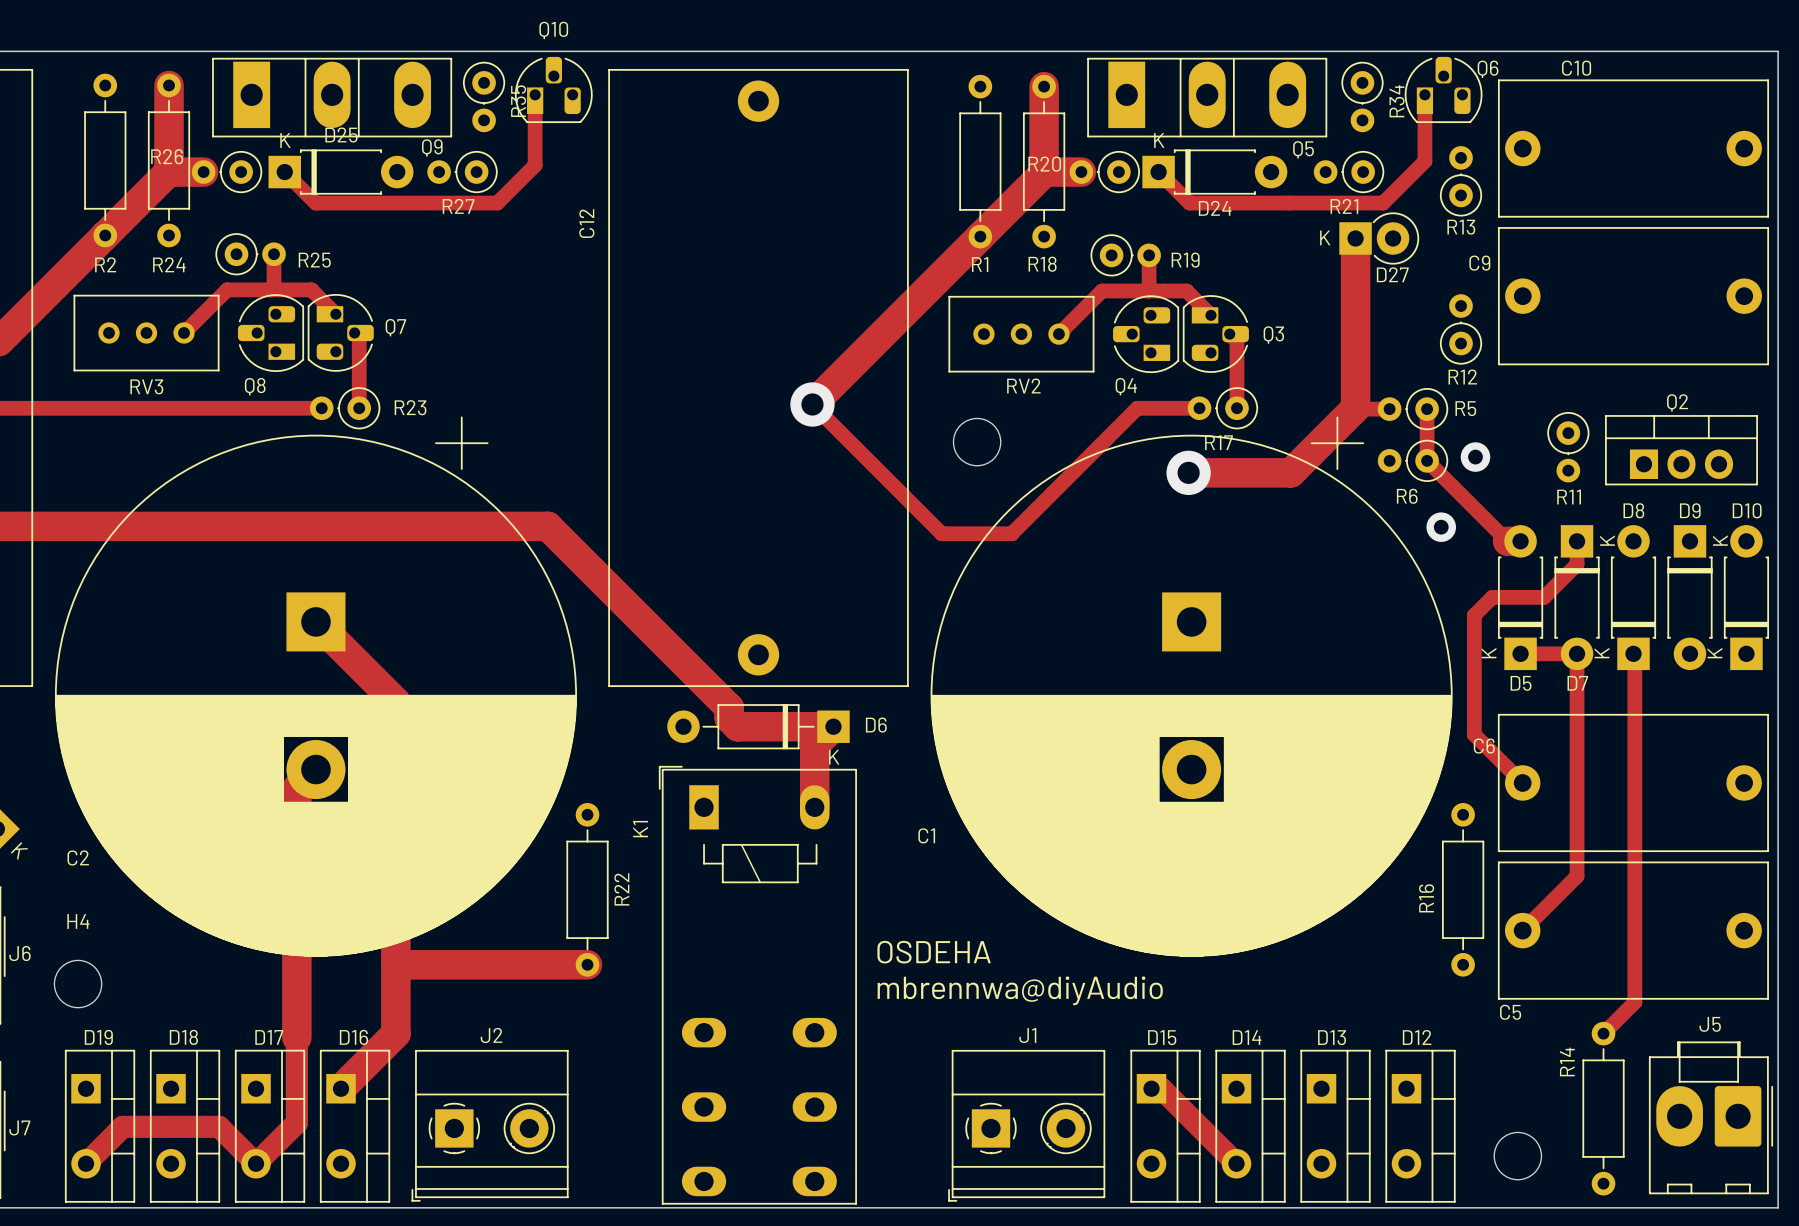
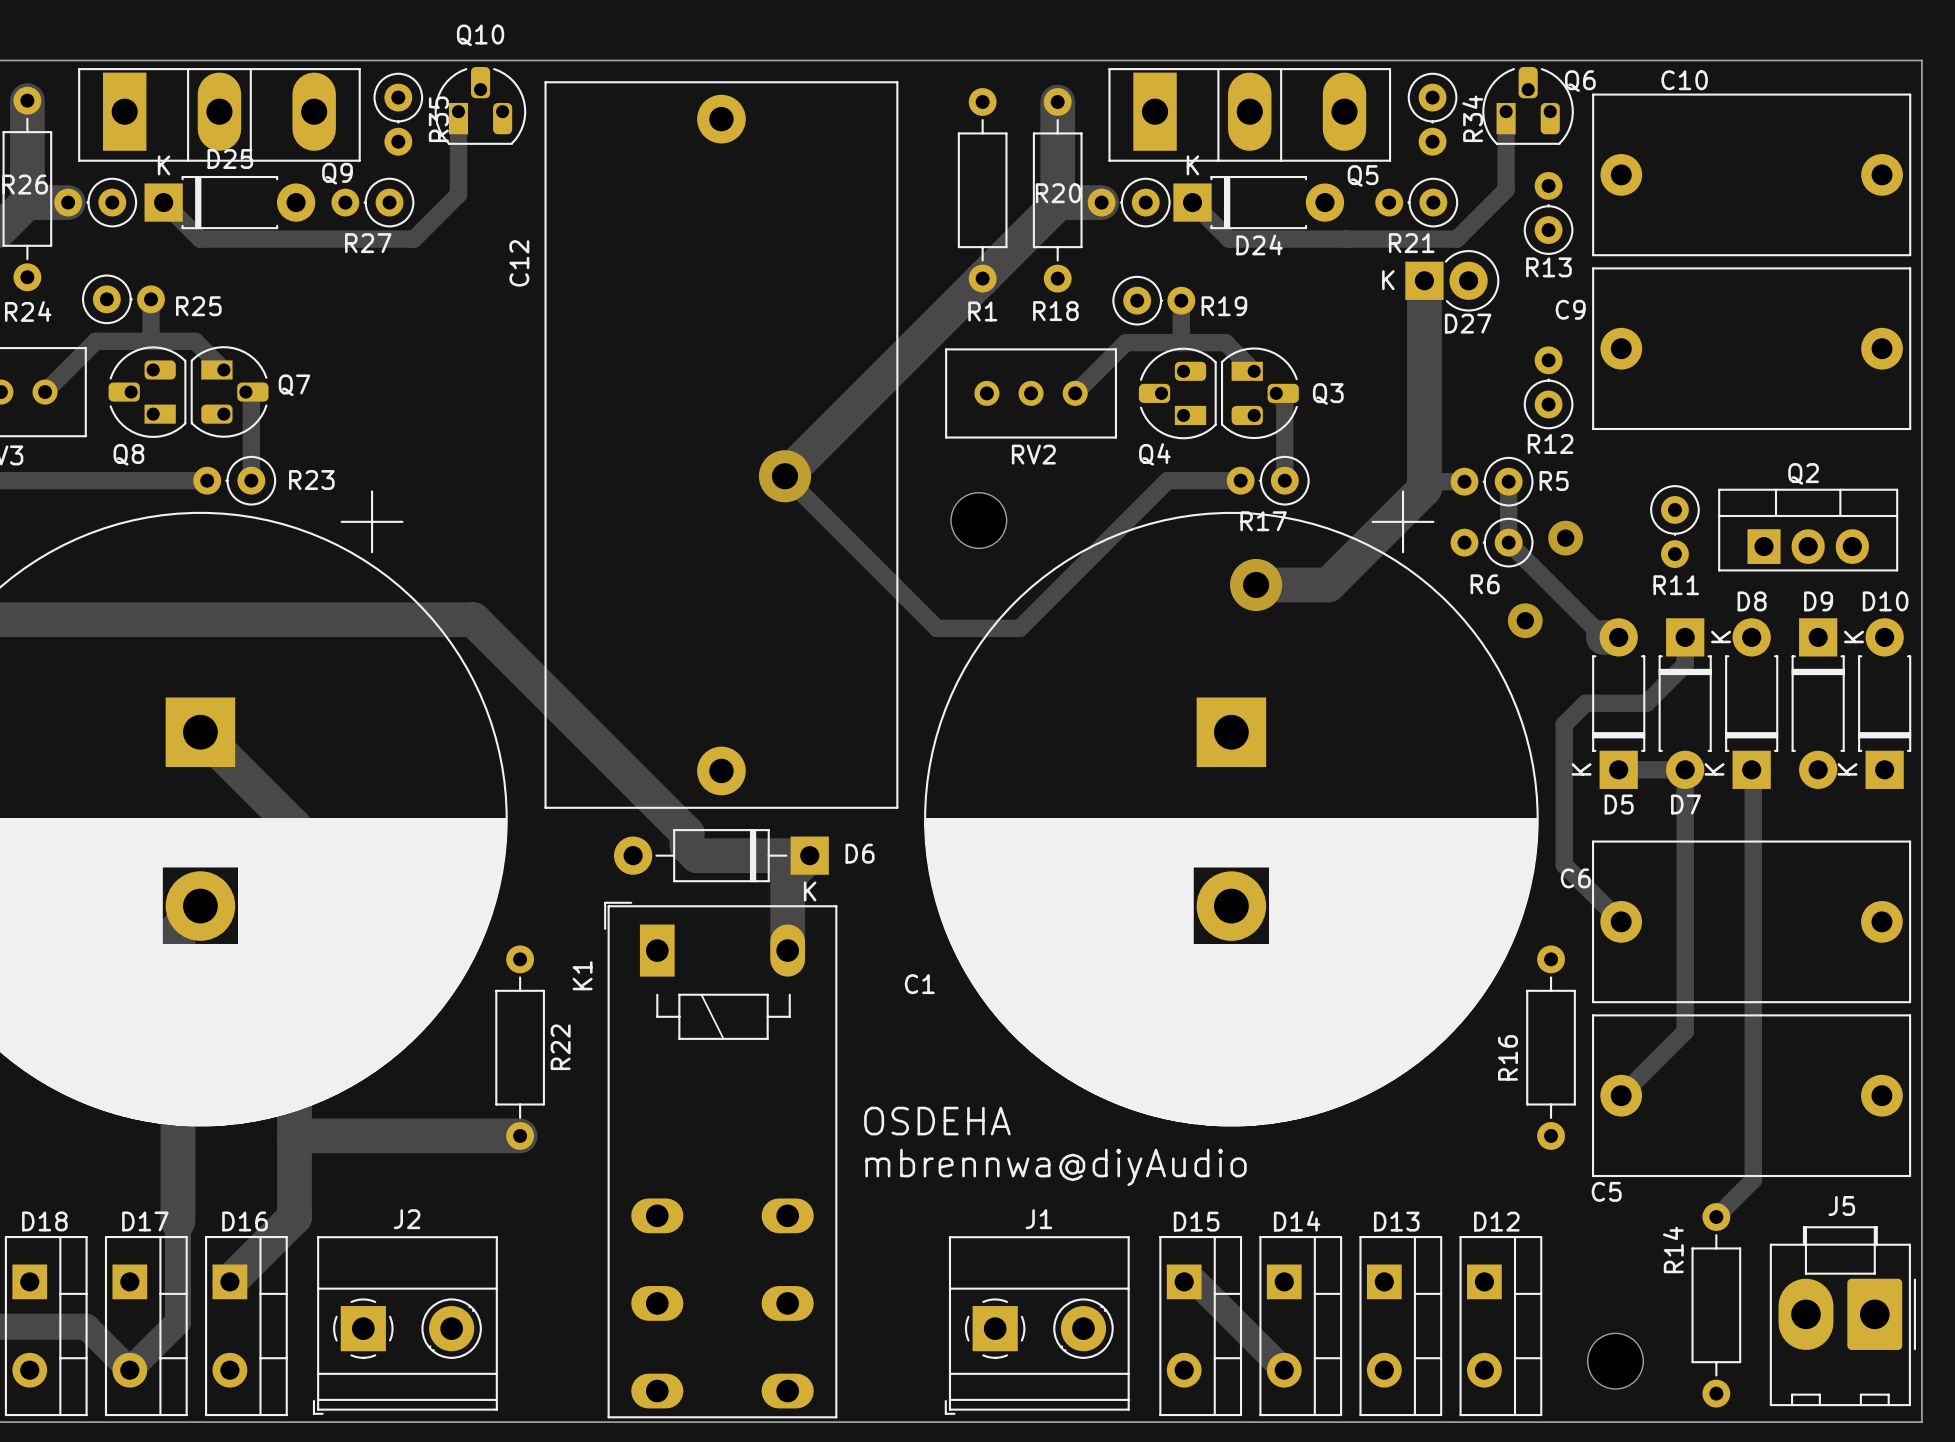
track: (1355, 408) (1290, 472) (1188, 472) -> (1424, 480) (1424, 488) (1328, 584) (1256, 584)
via position: (1188, 472) -> (1256, 584)

